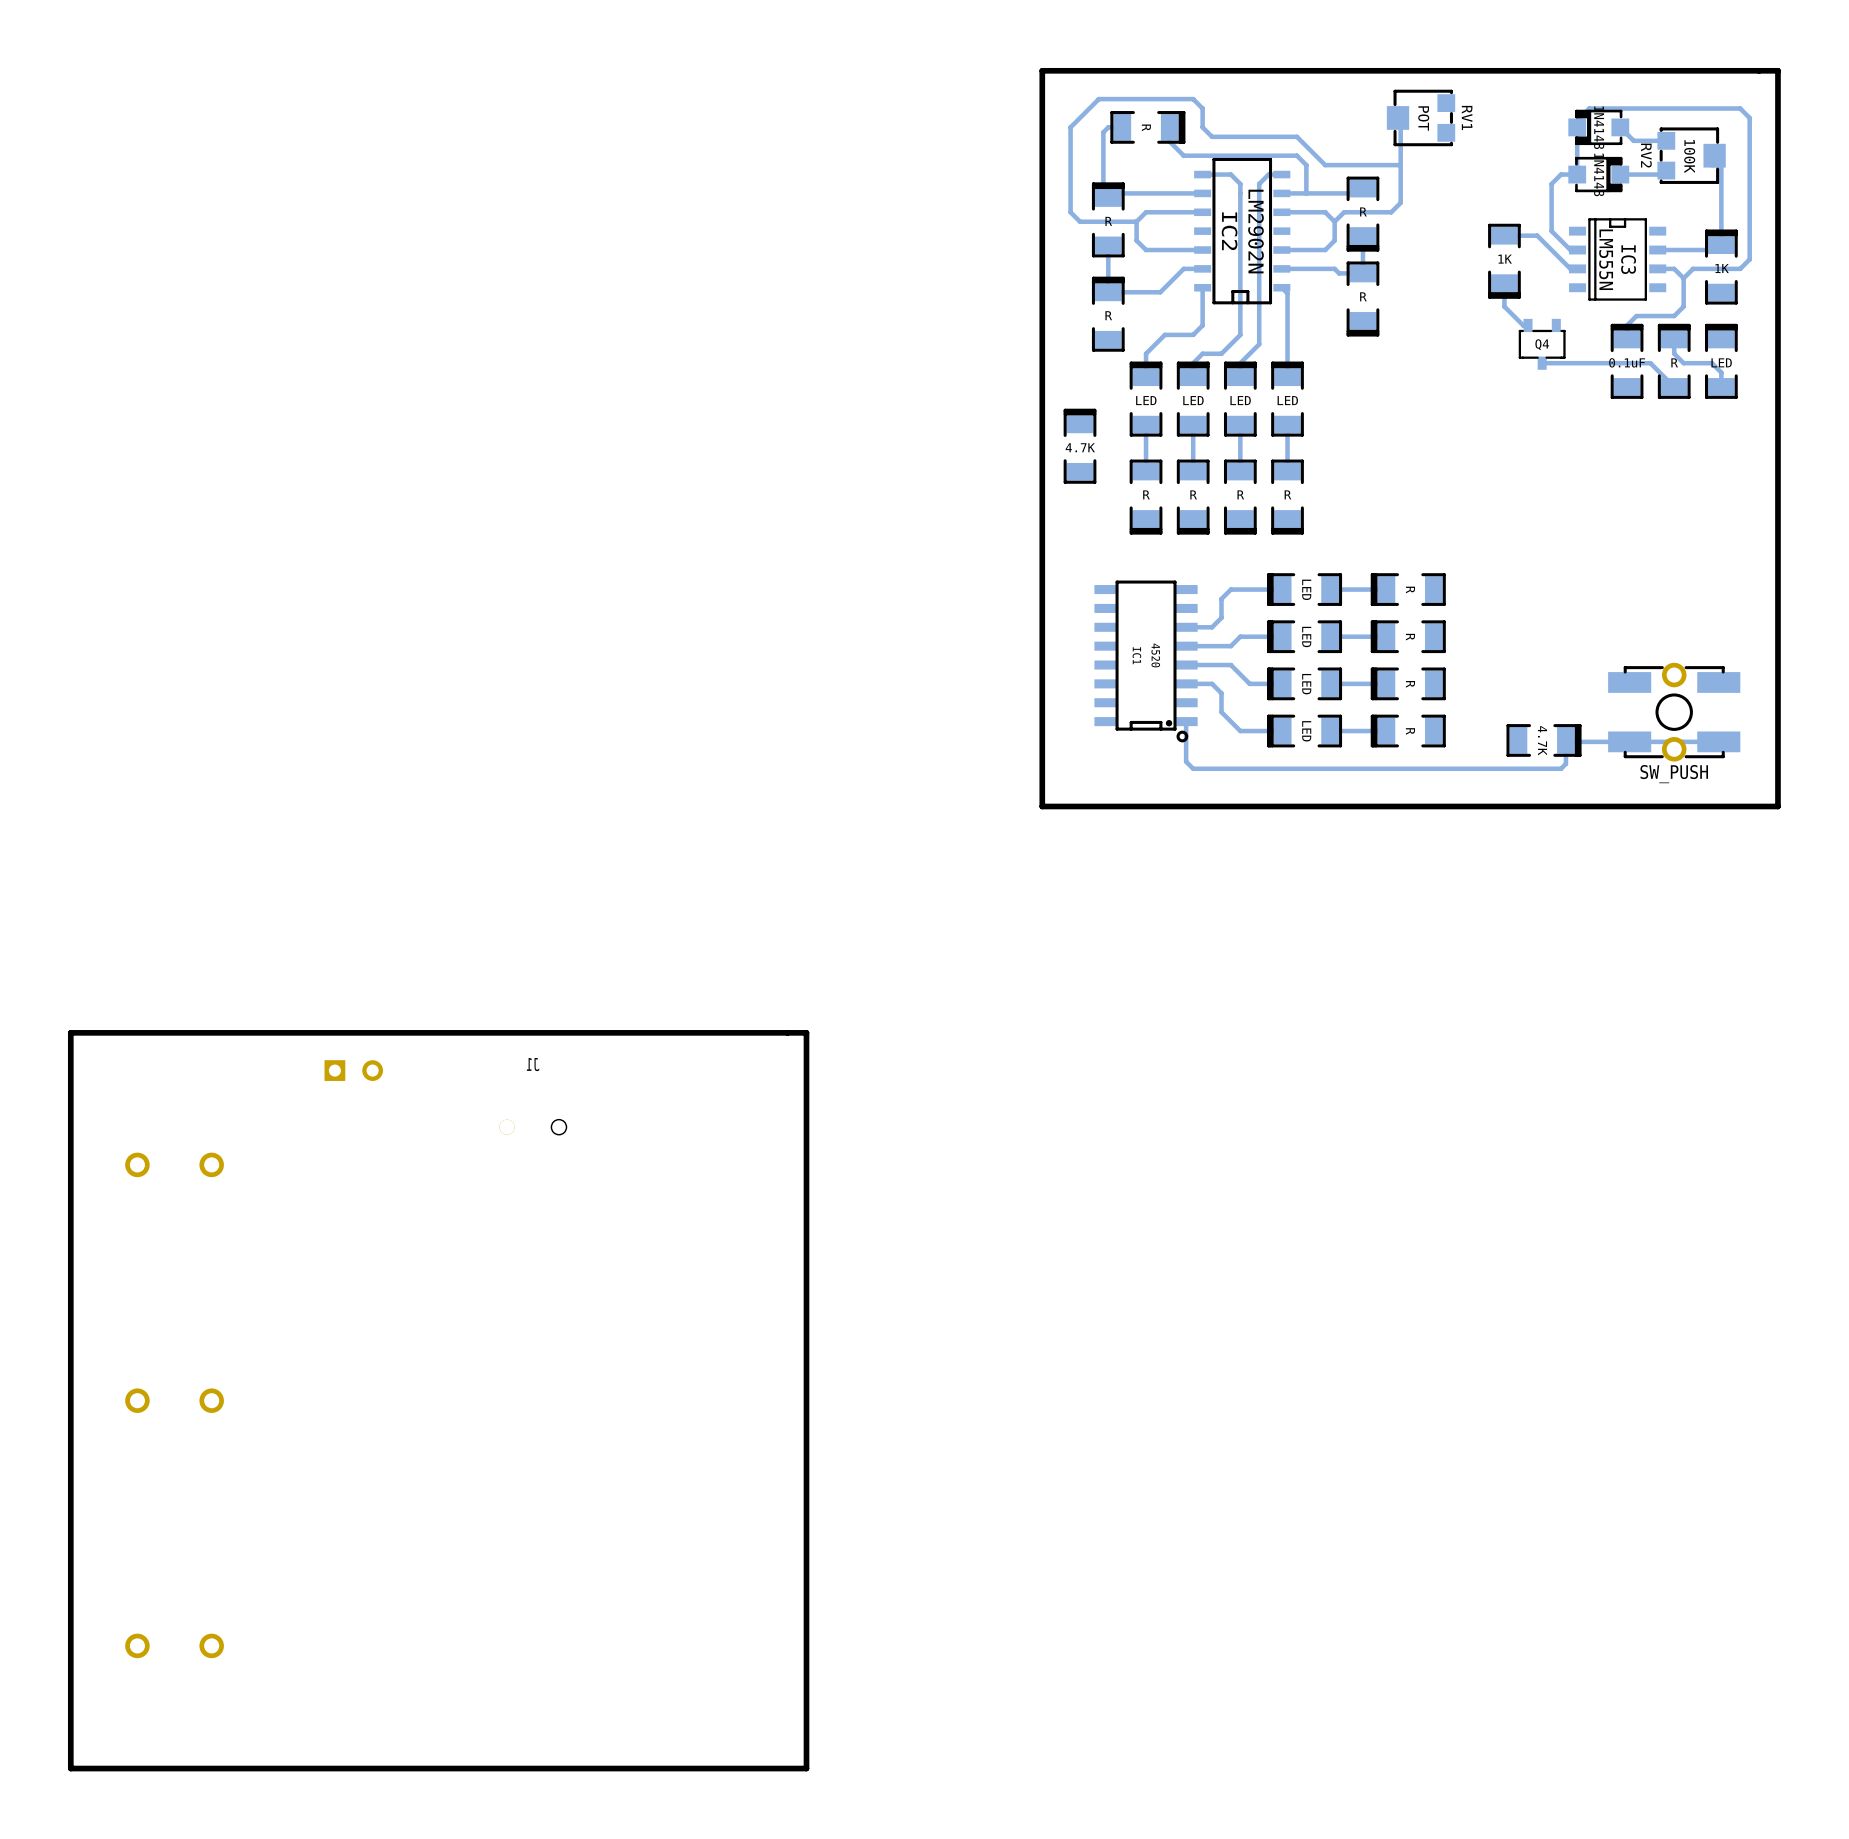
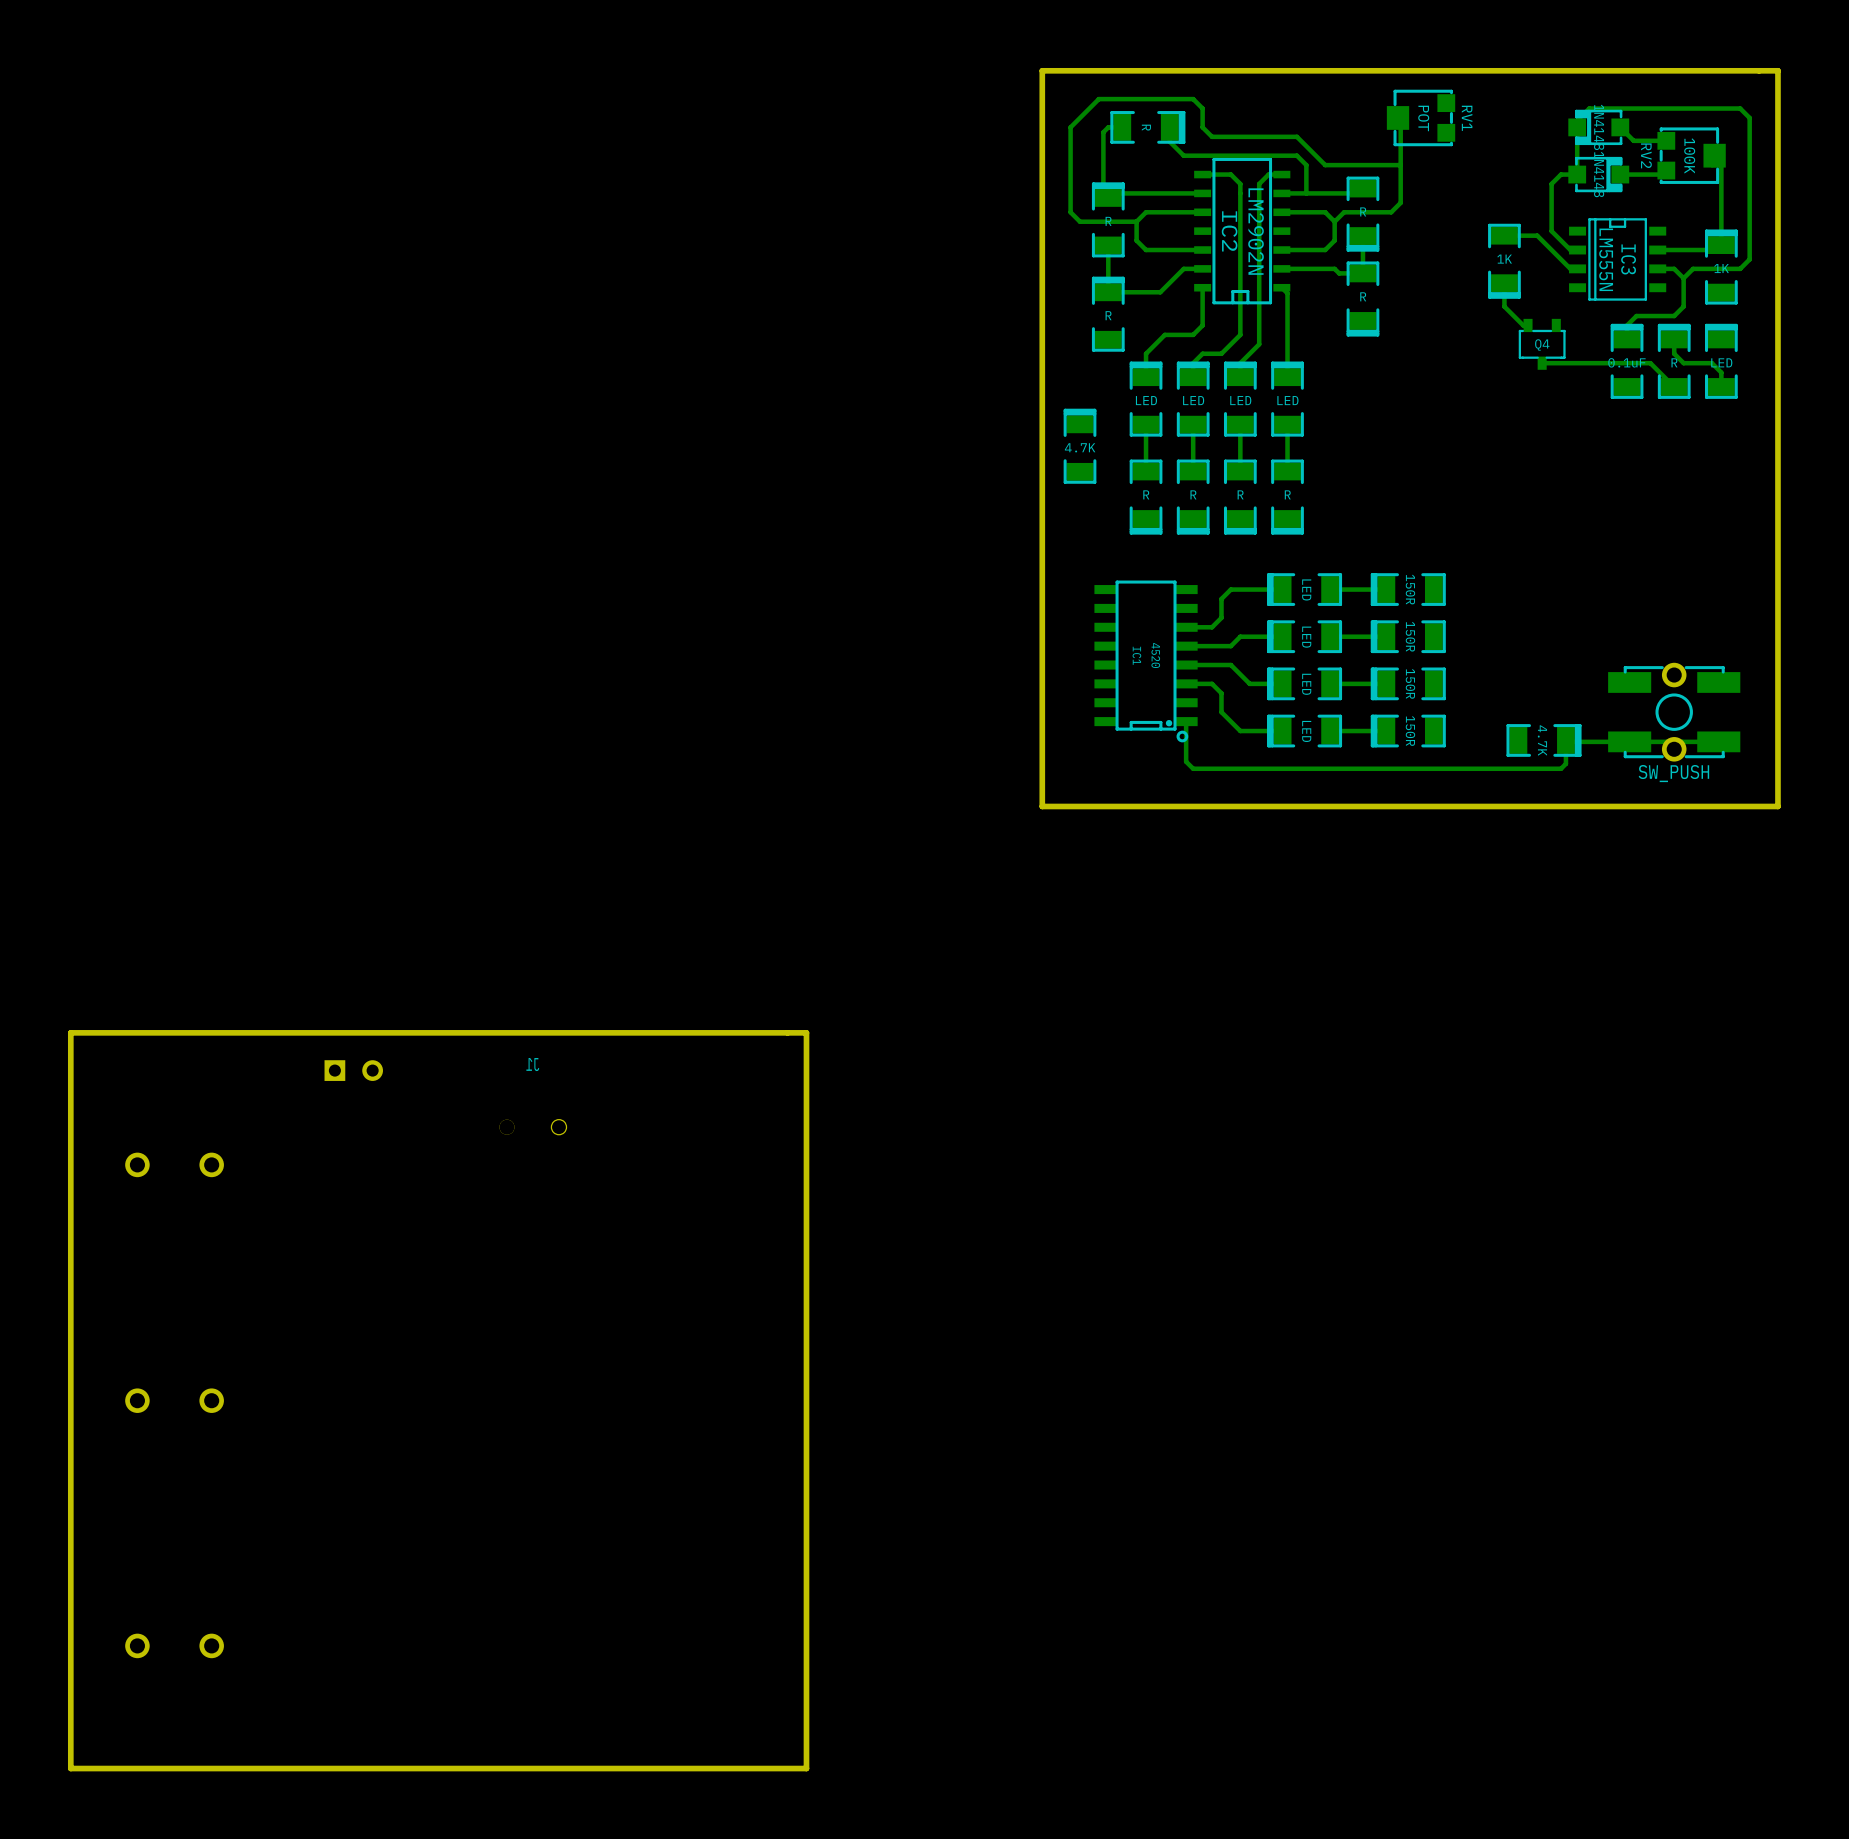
part value: R (1410, 589) -> 150R (1410, 589)
part value: R (1410, 637) -> 150R (1410, 636)
part value: R (1410, 684) -> 150R (1410, 683)
part value: R (1410, 731) -> 150R (1410, 731)

